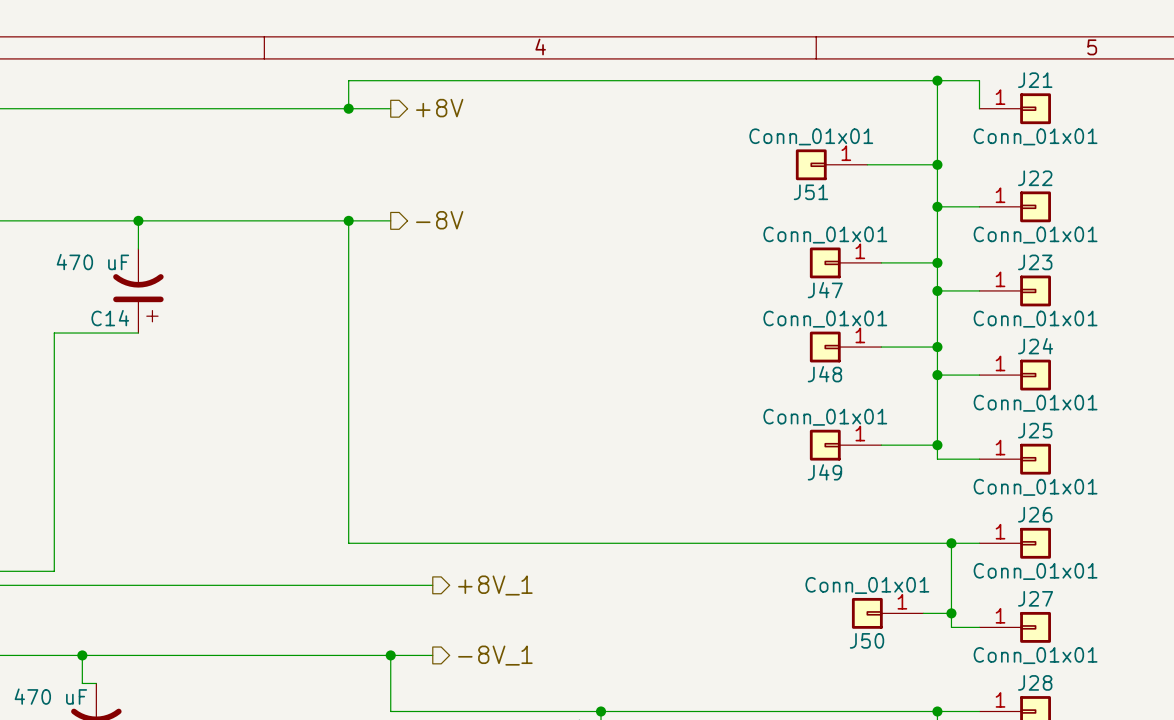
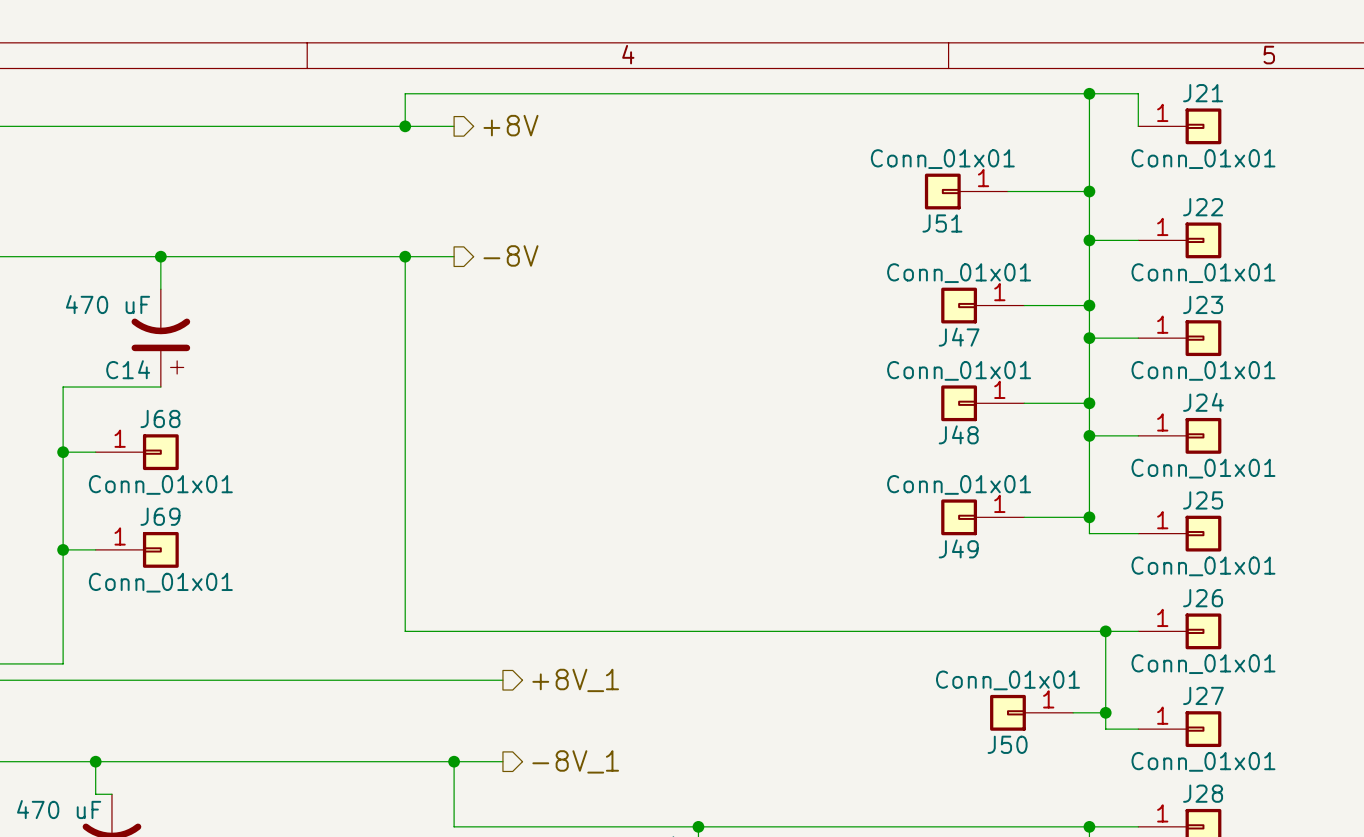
wire: none -> (63, 452) (95, 452)
junction: none -> (63, 452)
J68: none -> Conn_01x01 (137, 452)
wire: none -> (63, 549) (95, 549)
junction: none -> (63, 549)
J69: none -> Conn_01x01 (137, 549)

